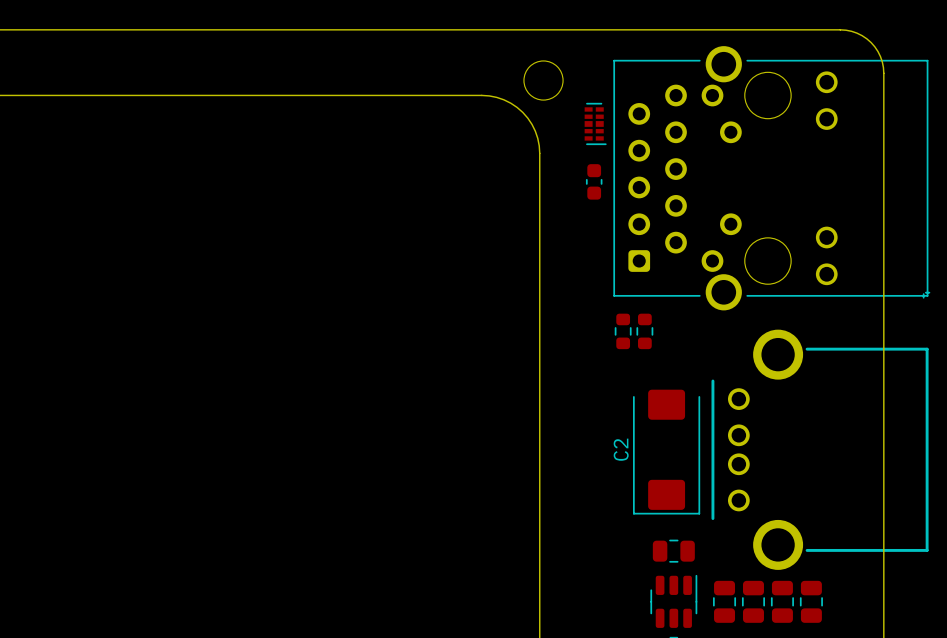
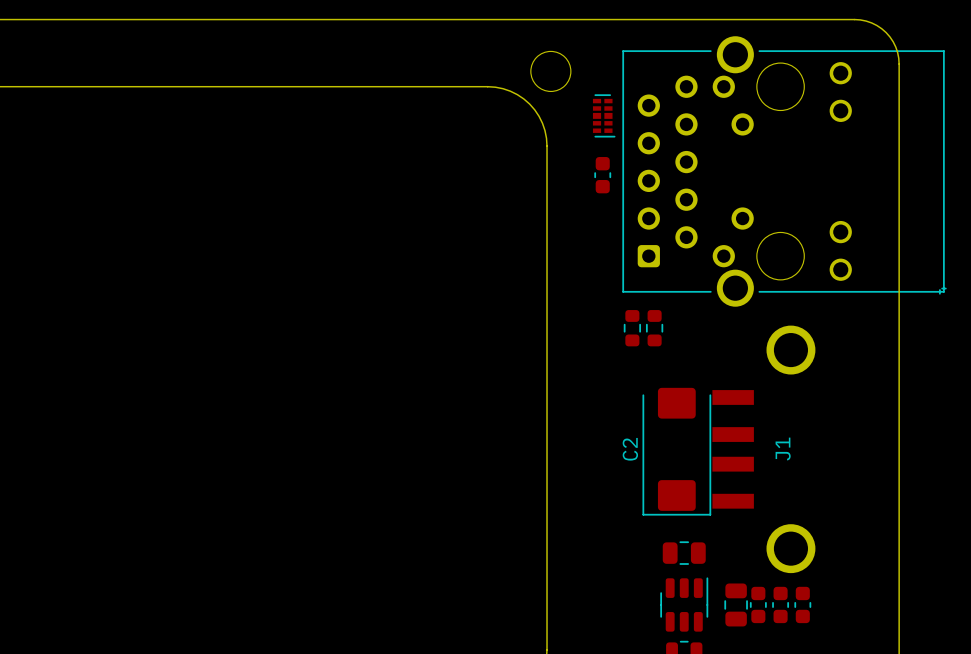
J1: none -> (763, 449)
part: (820, 449) -> none
part: none -> (758, 604)
part: (753, 601) -> none
part: none -> (780, 604)
part: (782, 601) -> none
part: none -> (802, 604)
part: (811, 601) -> none

